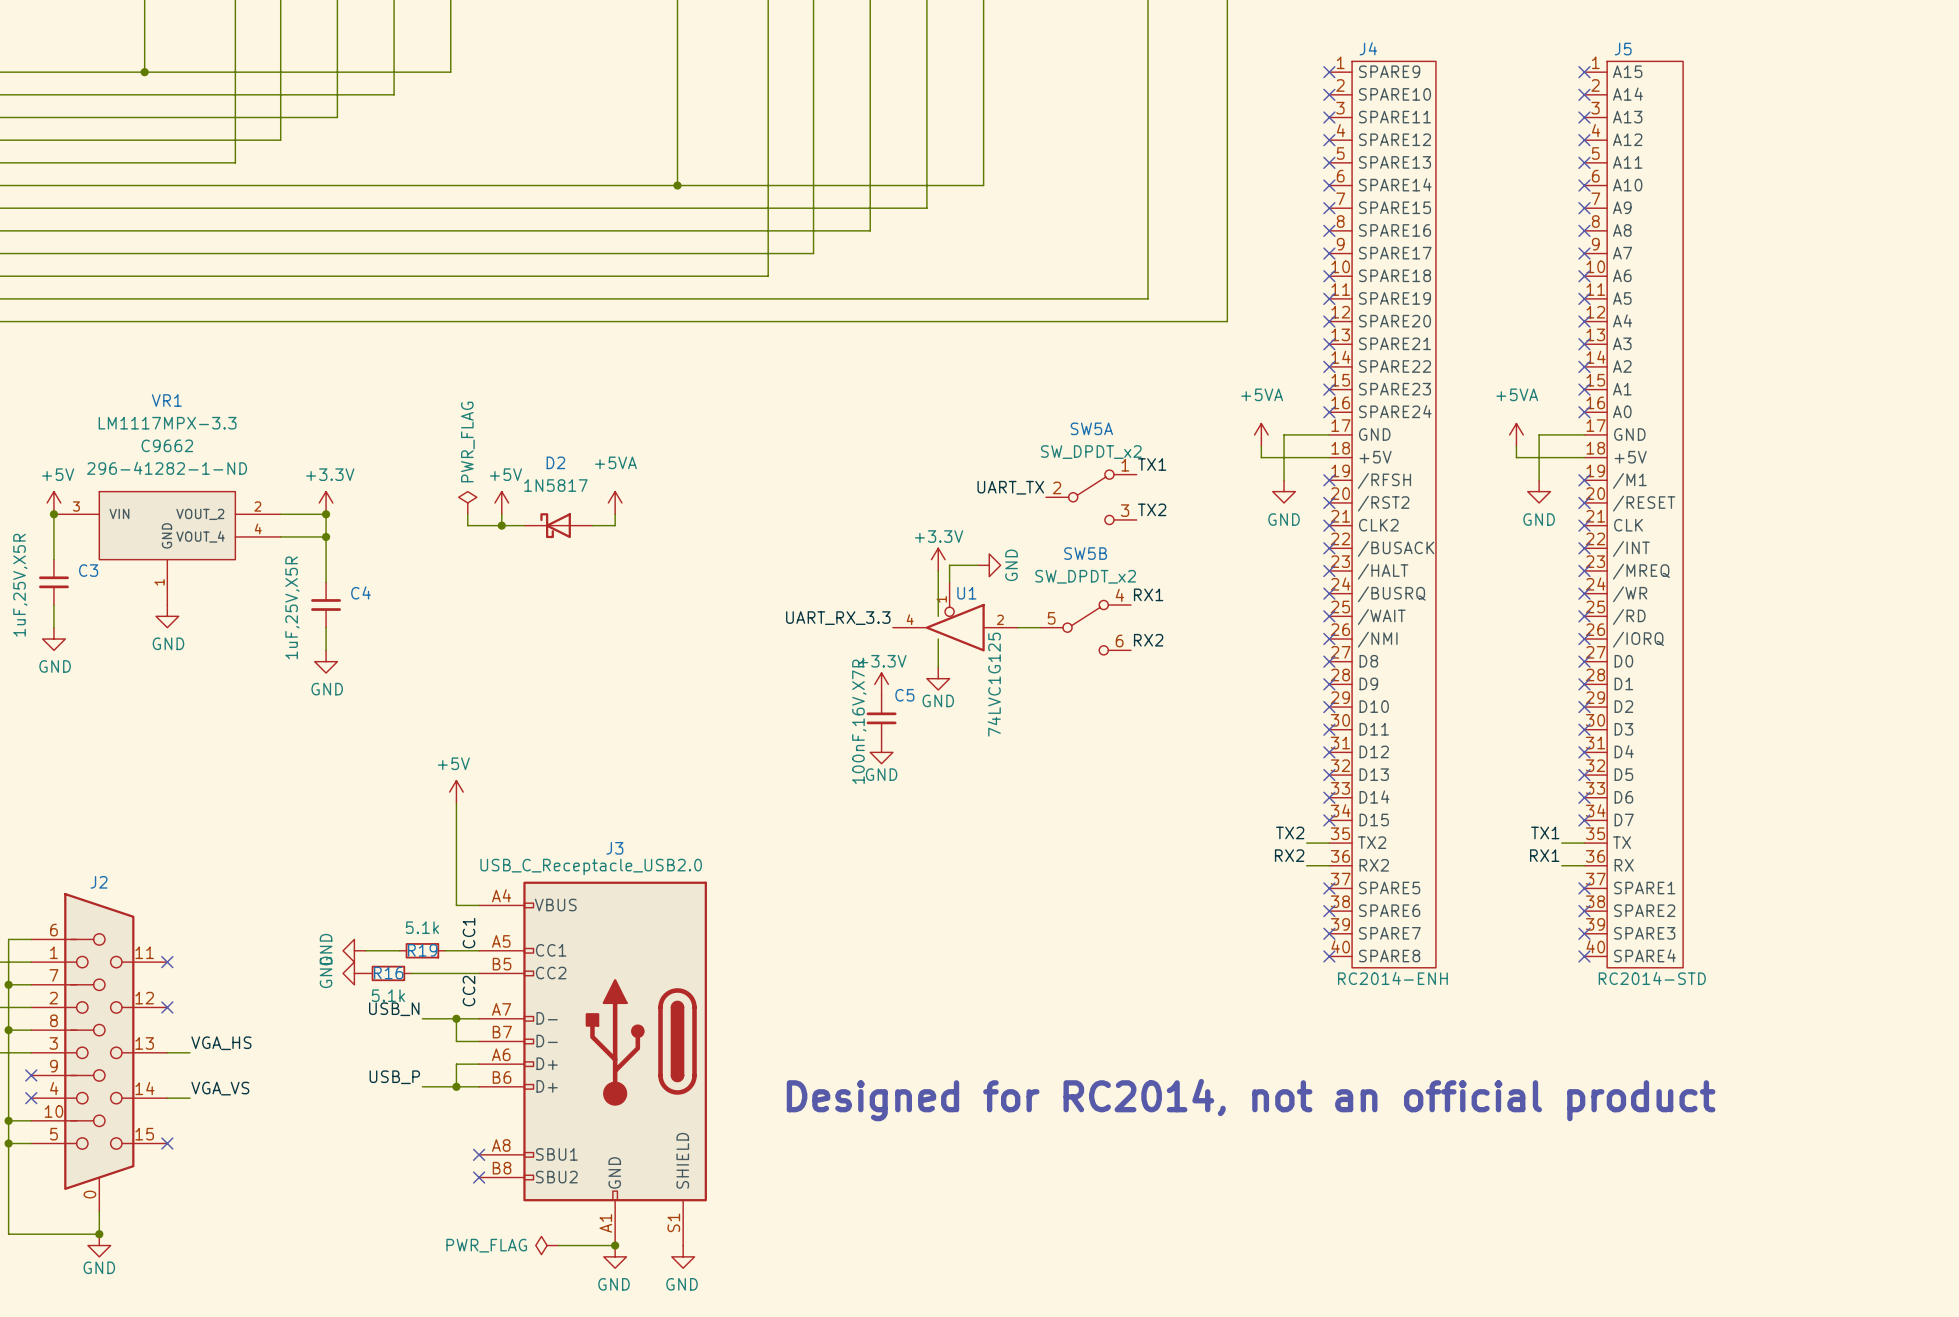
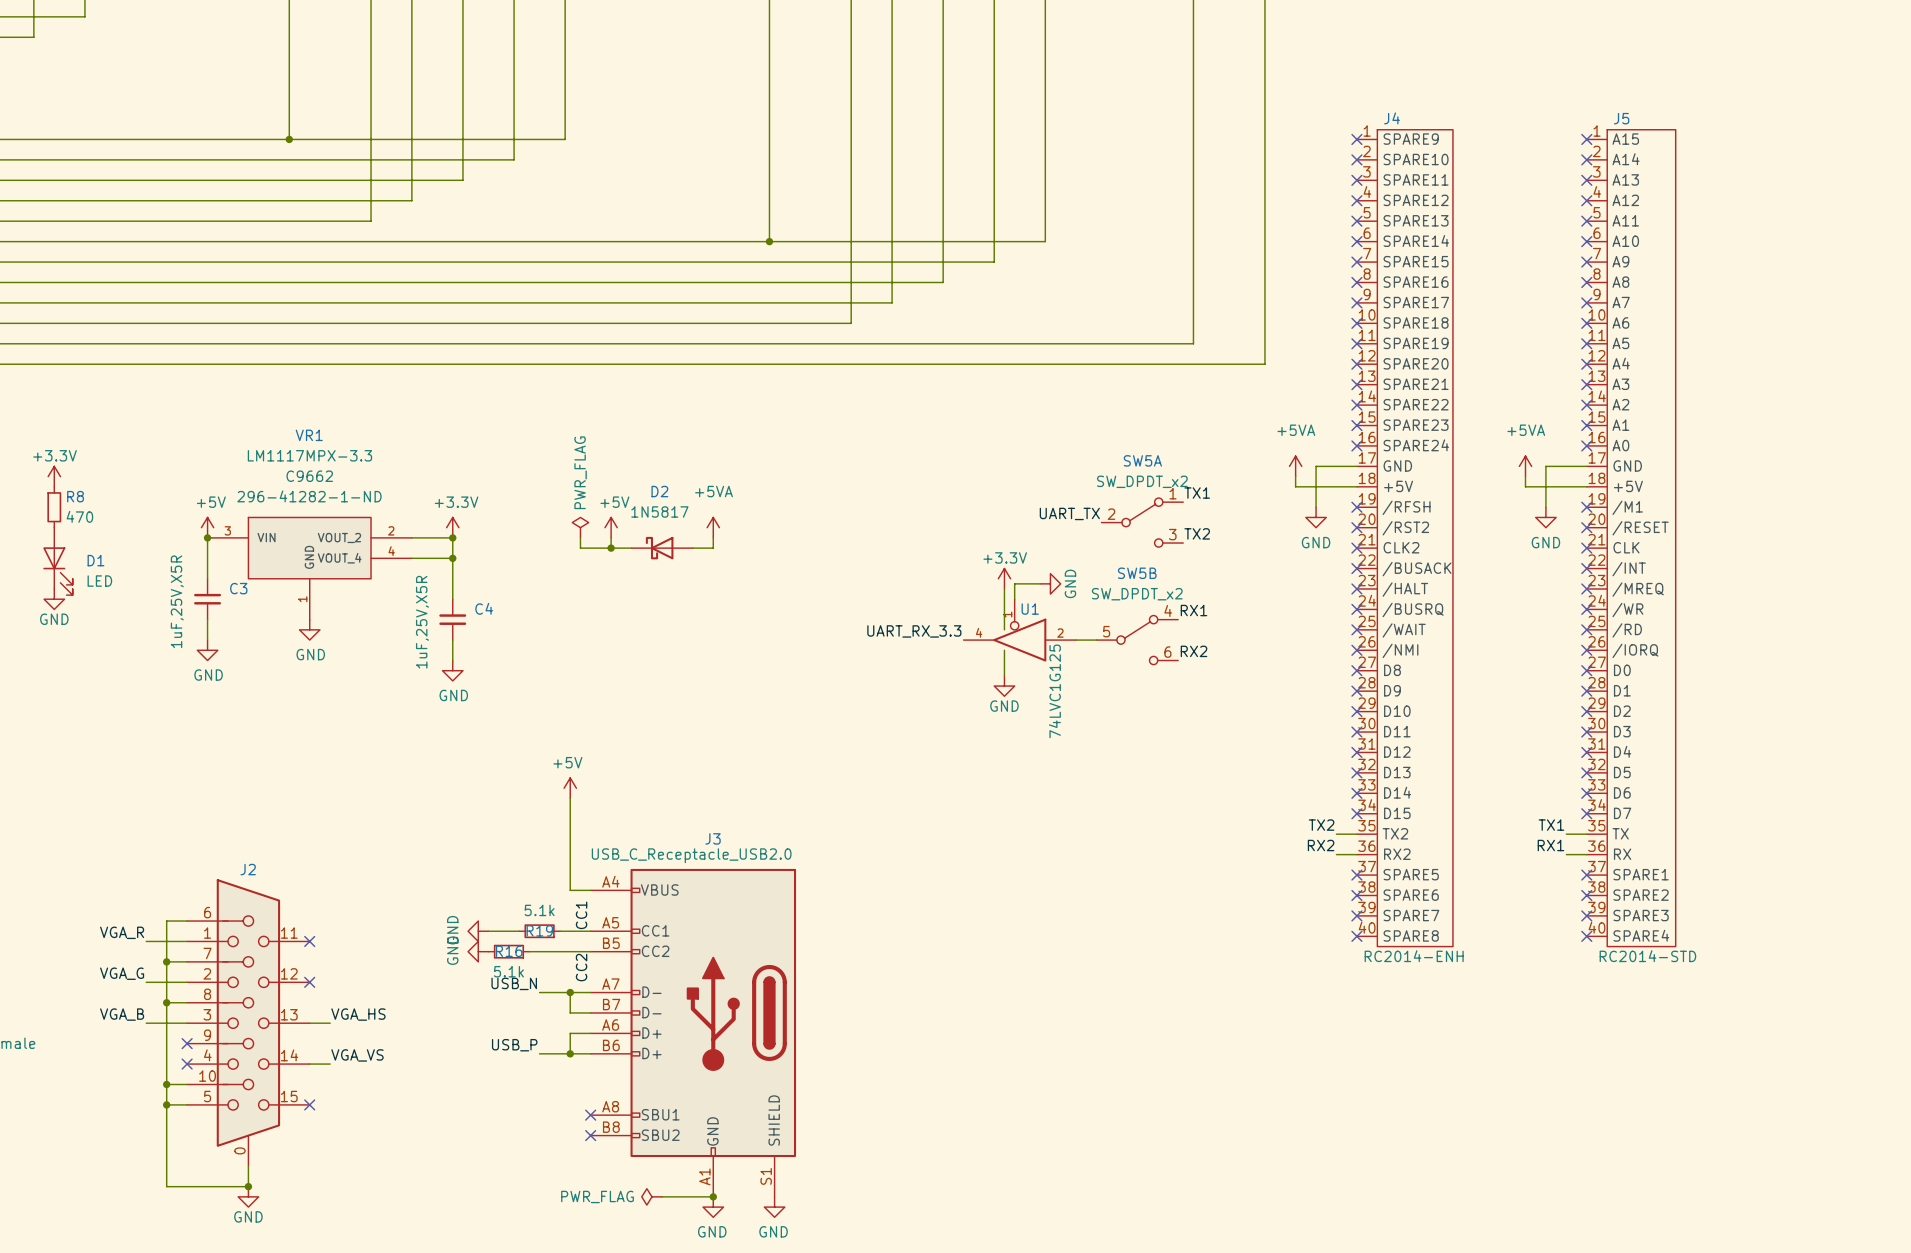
power symbol: +3.3V (881, 684) -> none
C5: 100nF,16V,X7R (881, 718) -> none
power symbol: GND (881, 752) -> none
text: Designed for RC2014, not an official product (1251, 1100) -> none

